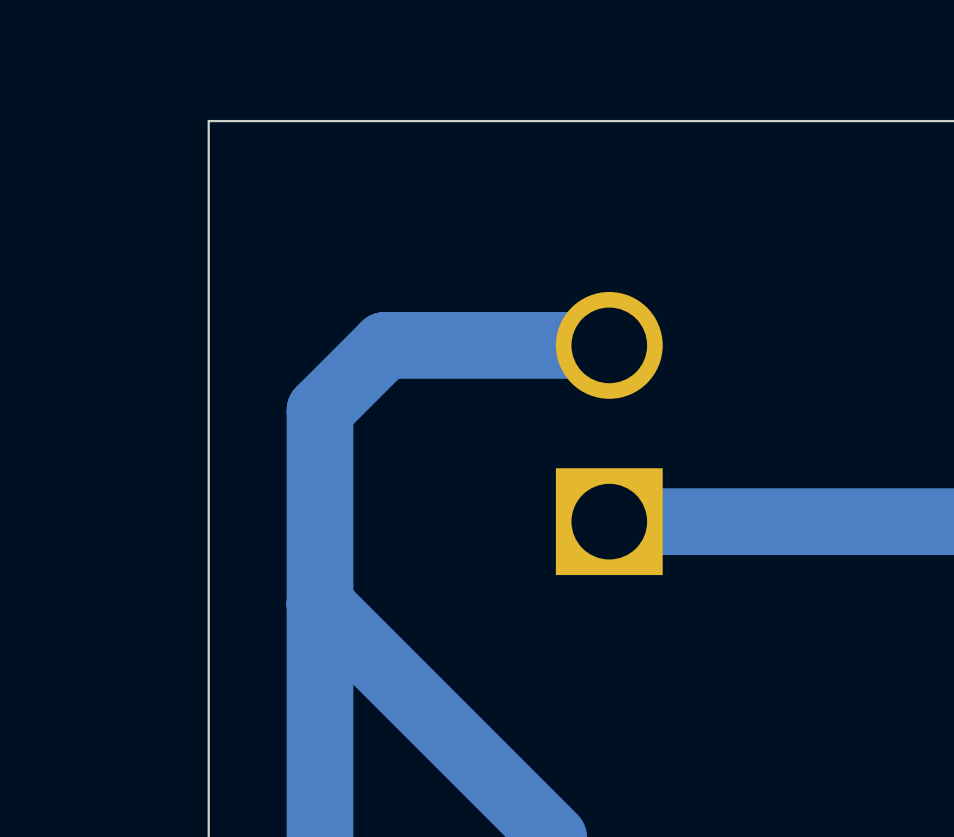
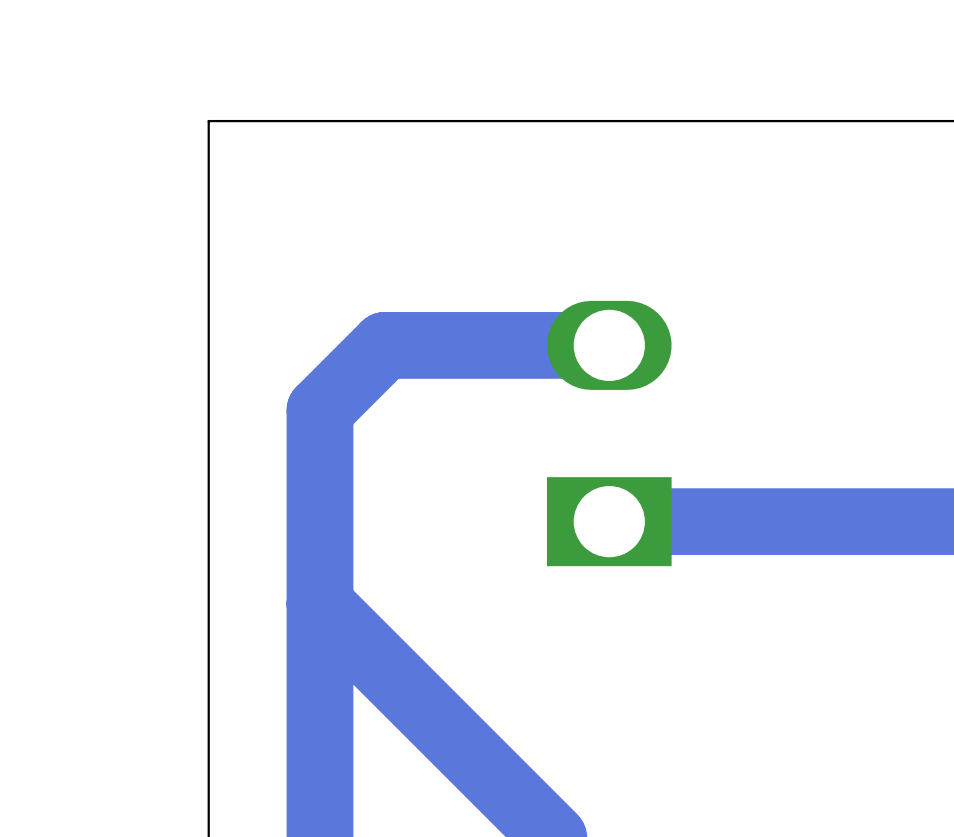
part footprint: [555, 291, 663, 576] -> [502, 300, 717, 567]

